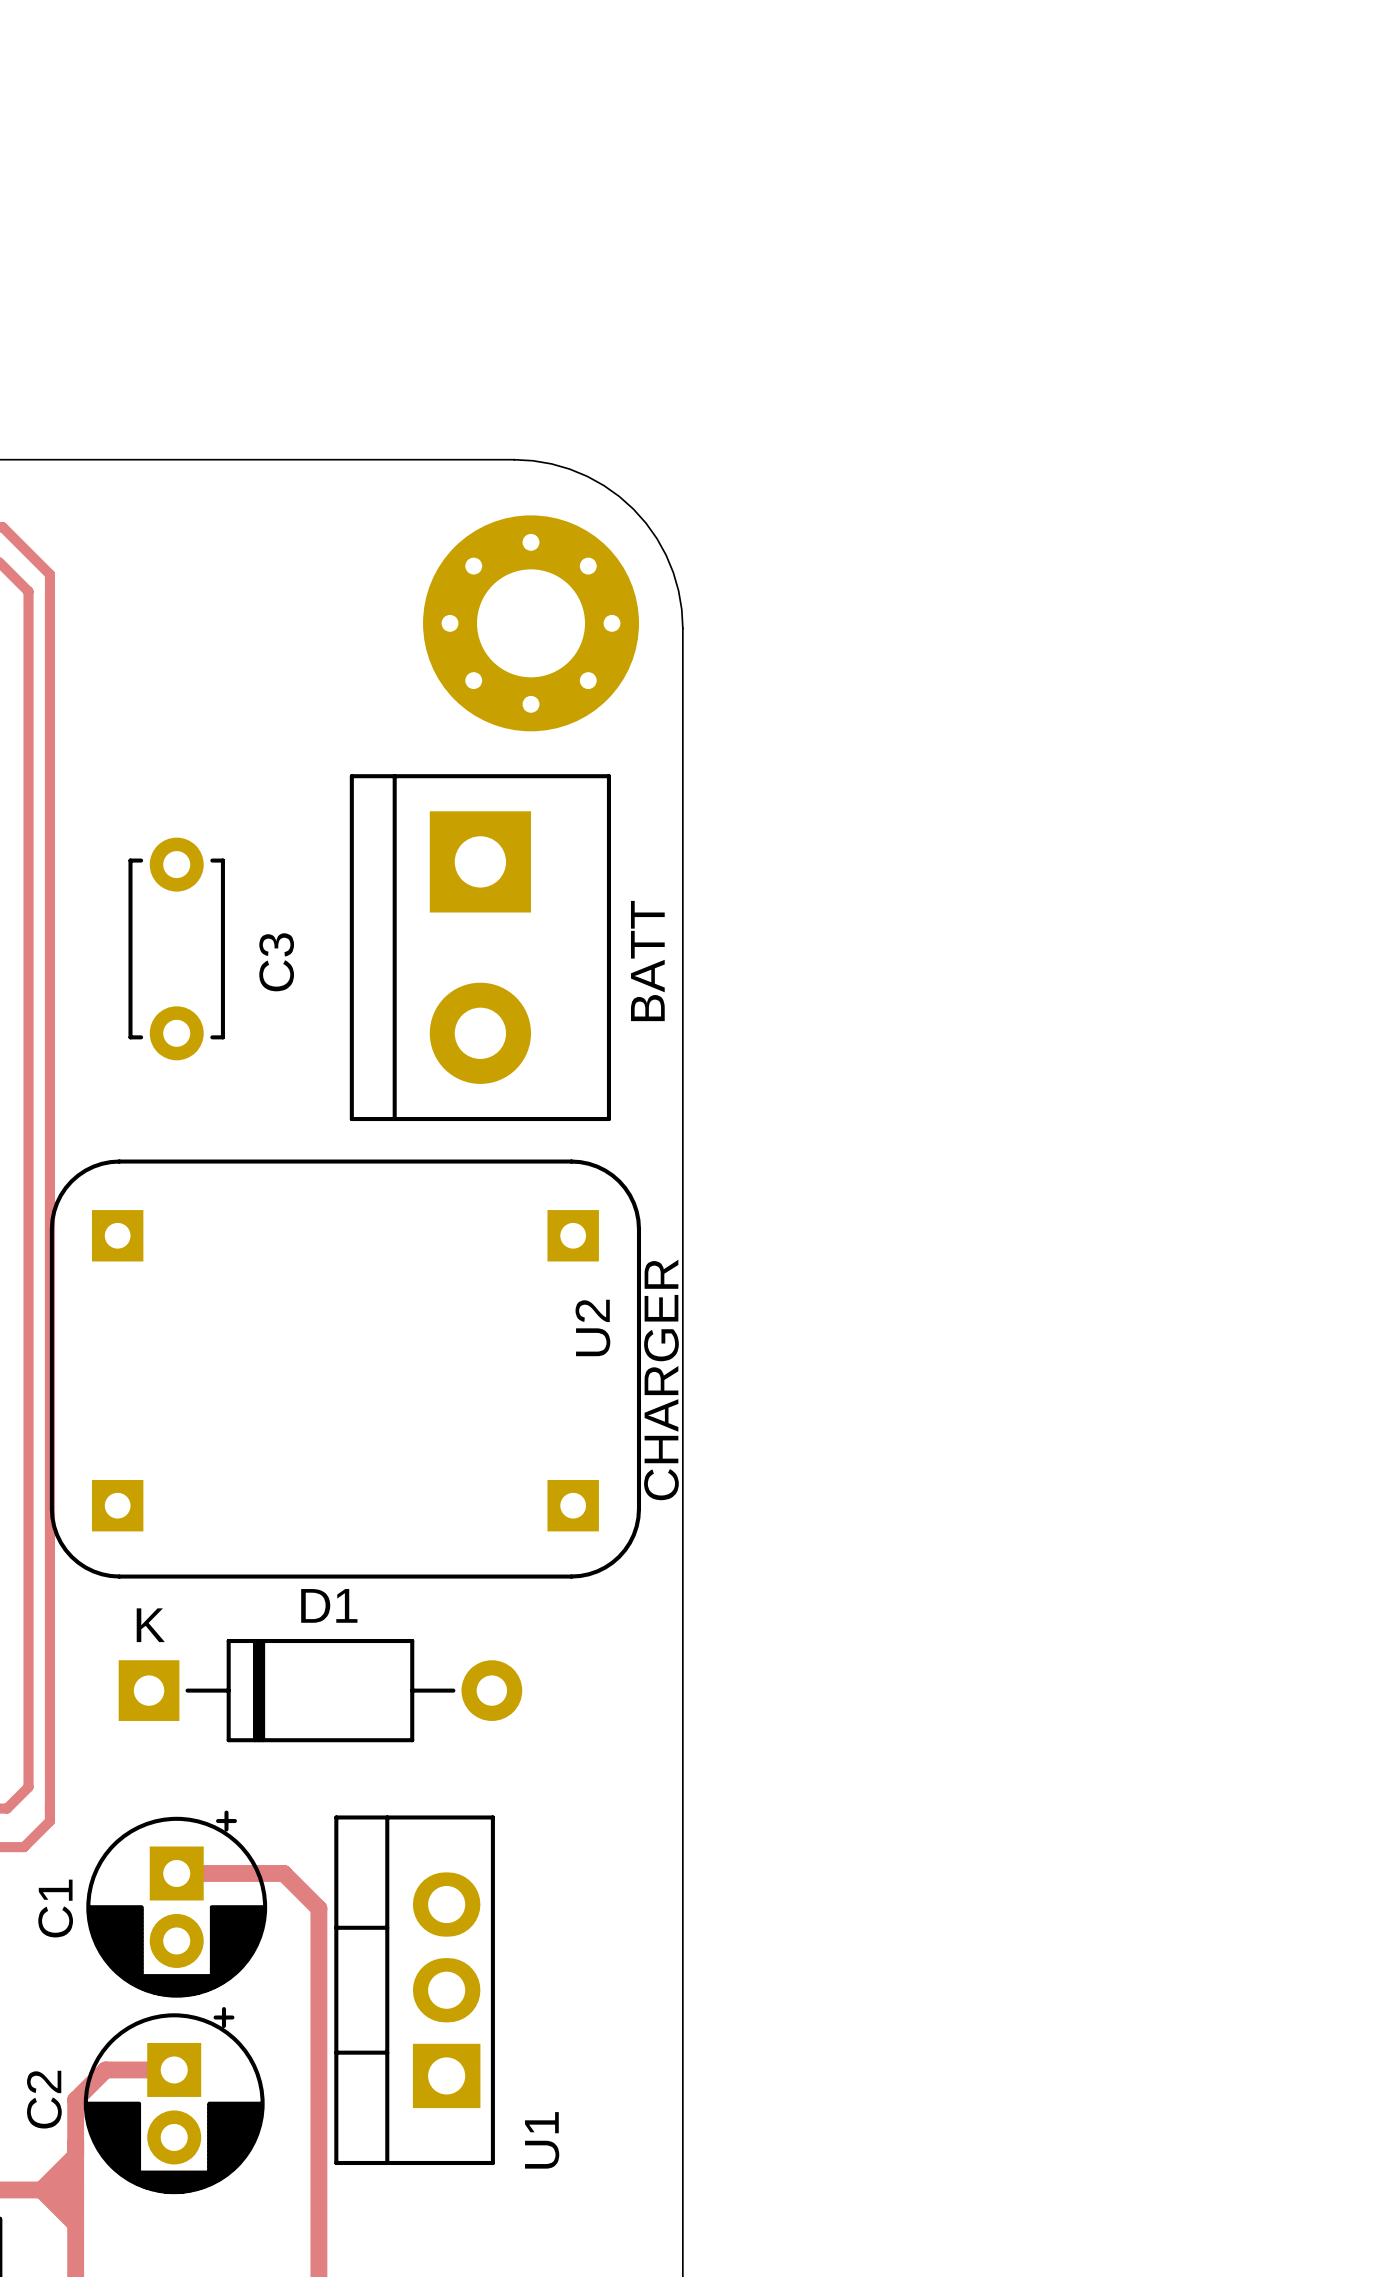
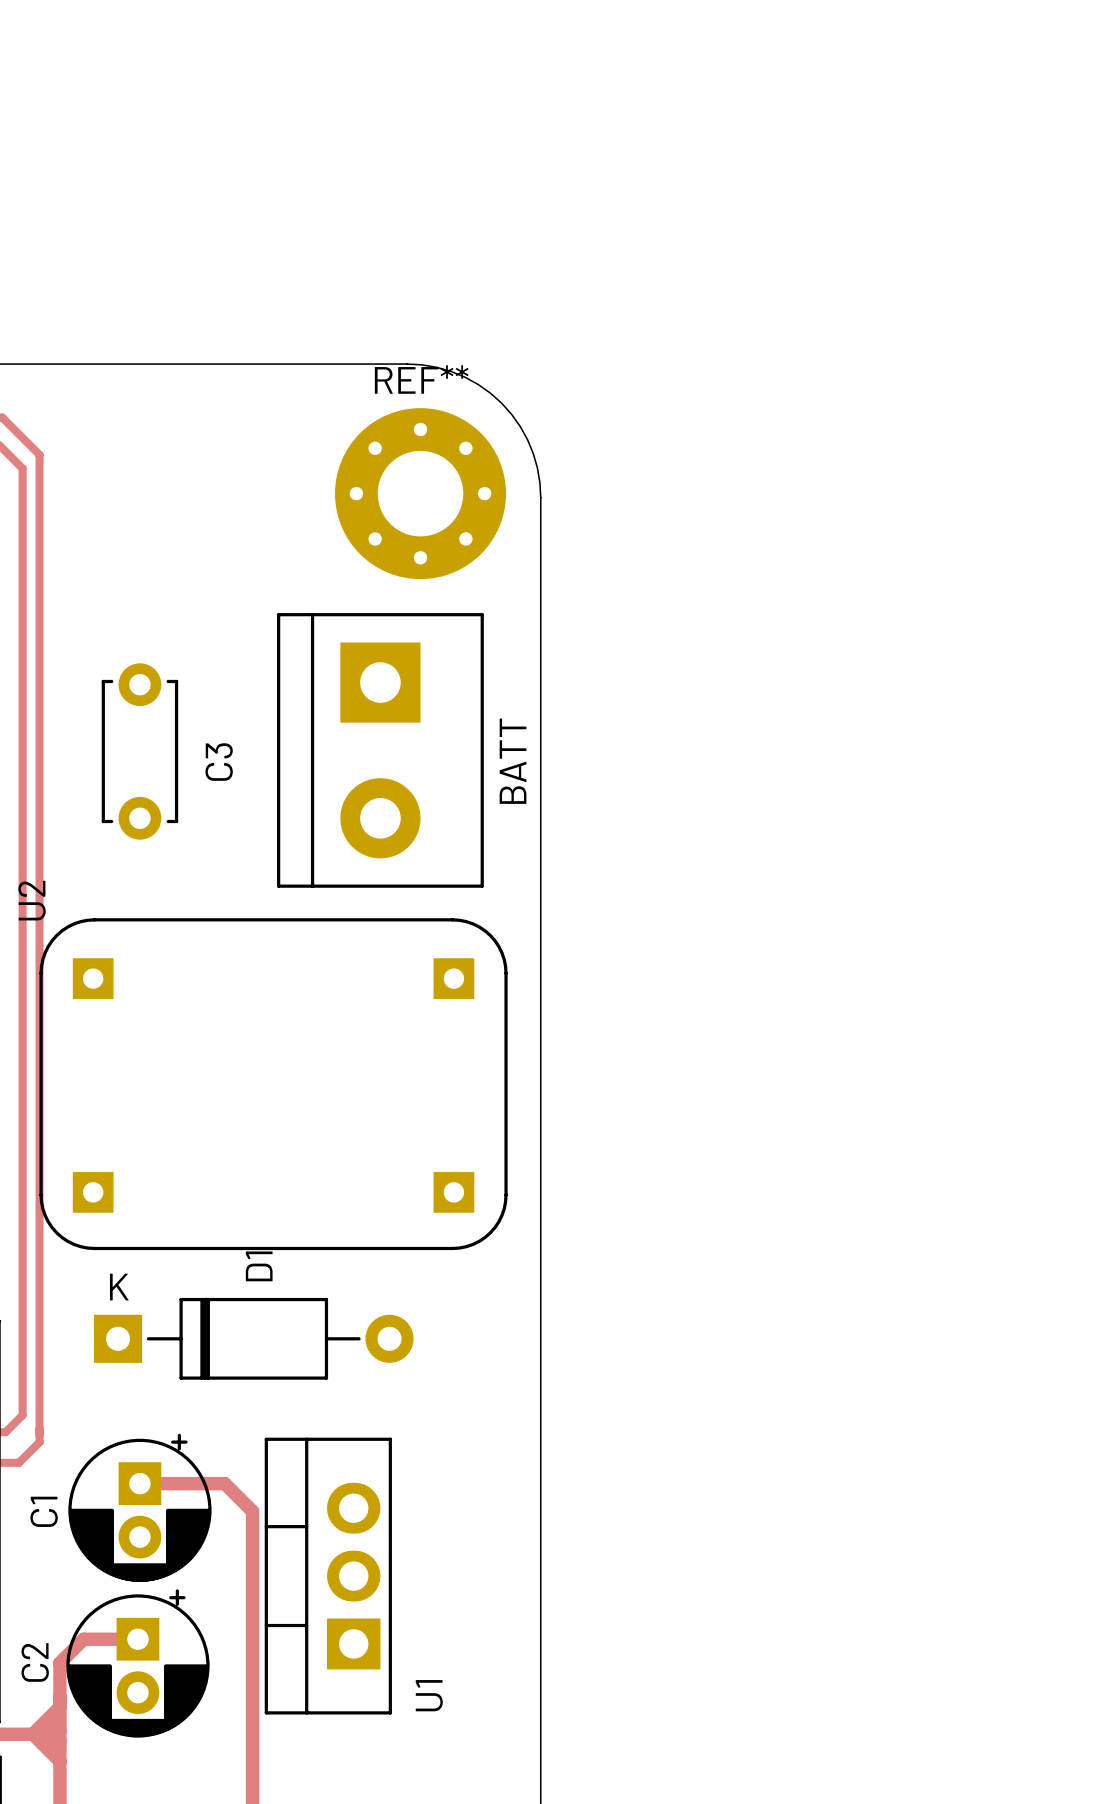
REF** name: none -> REF** (421, 379)
U2 name position: U2 (592, 1327) -> U2 (32, 900)
text: CHARGER (661, 1379) -> none
D1 name rotation: 0° (329, 1605) -> 90° counterclockwise (259, 1266)

